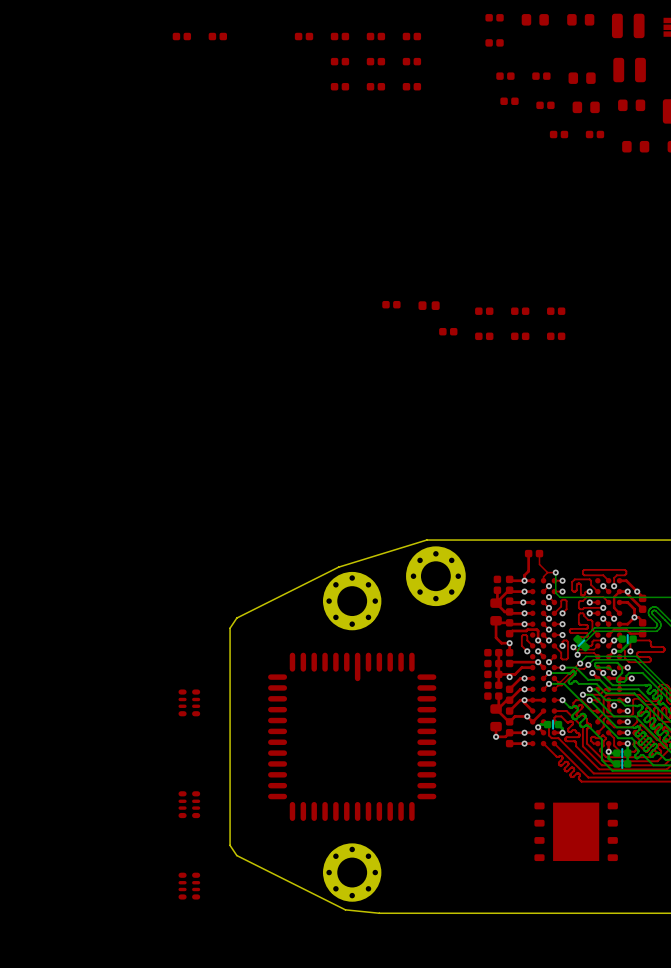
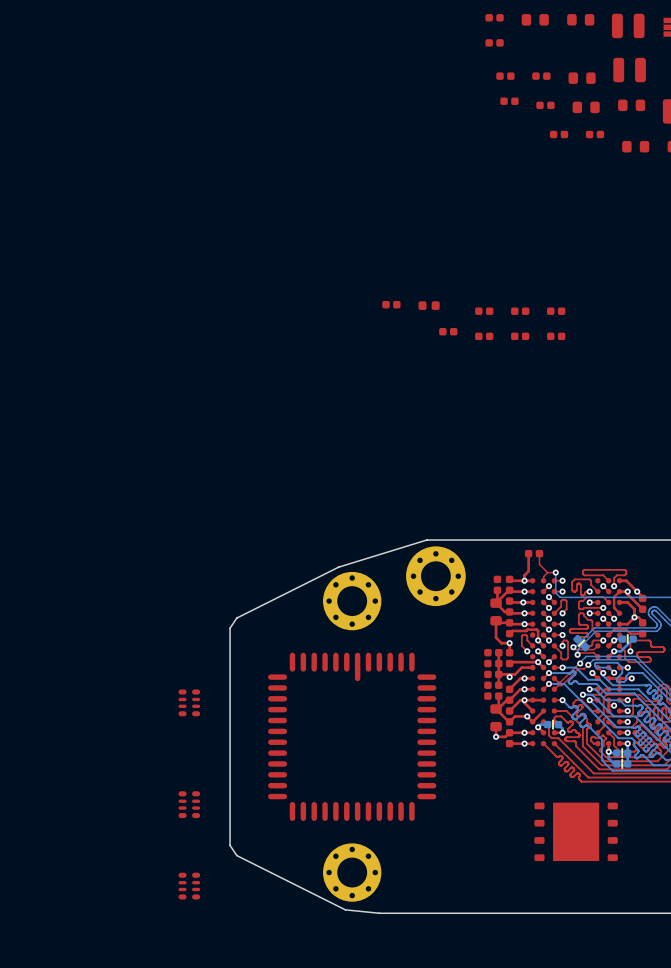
part: (181, 36) -> none
part: (217, 36) -> none
part: (304, 36) -> none
part: (339, 36) -> none
part: (375, 36) -> none
part: (411, 36) -> none
part: (339, 61) -> none
part: (375, 61) -> none
part: (411, 61) -> none
part: (339, 86) -> none
part: (375, 86) -> none
part: (411, 86) -> none

